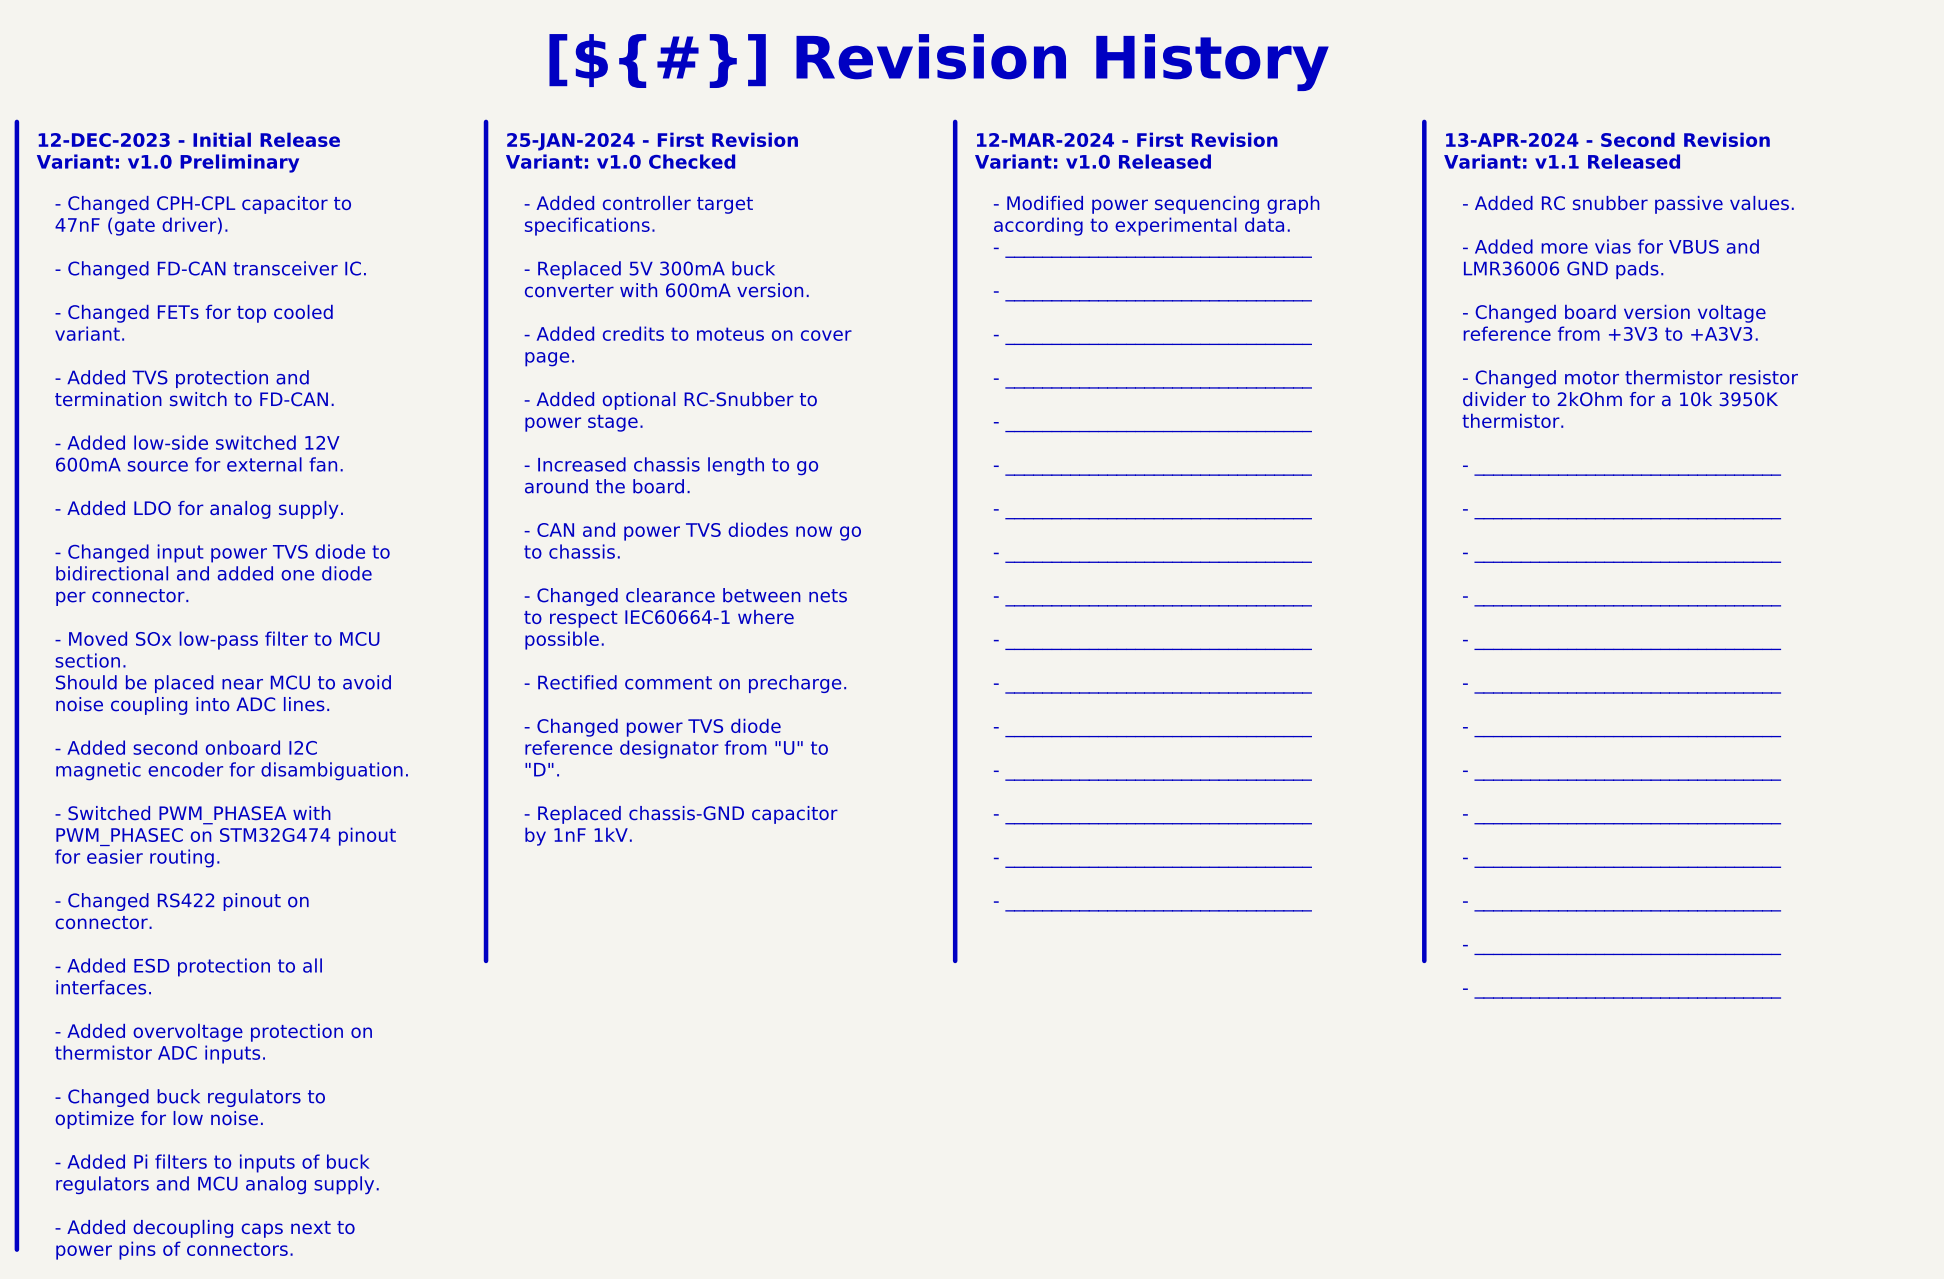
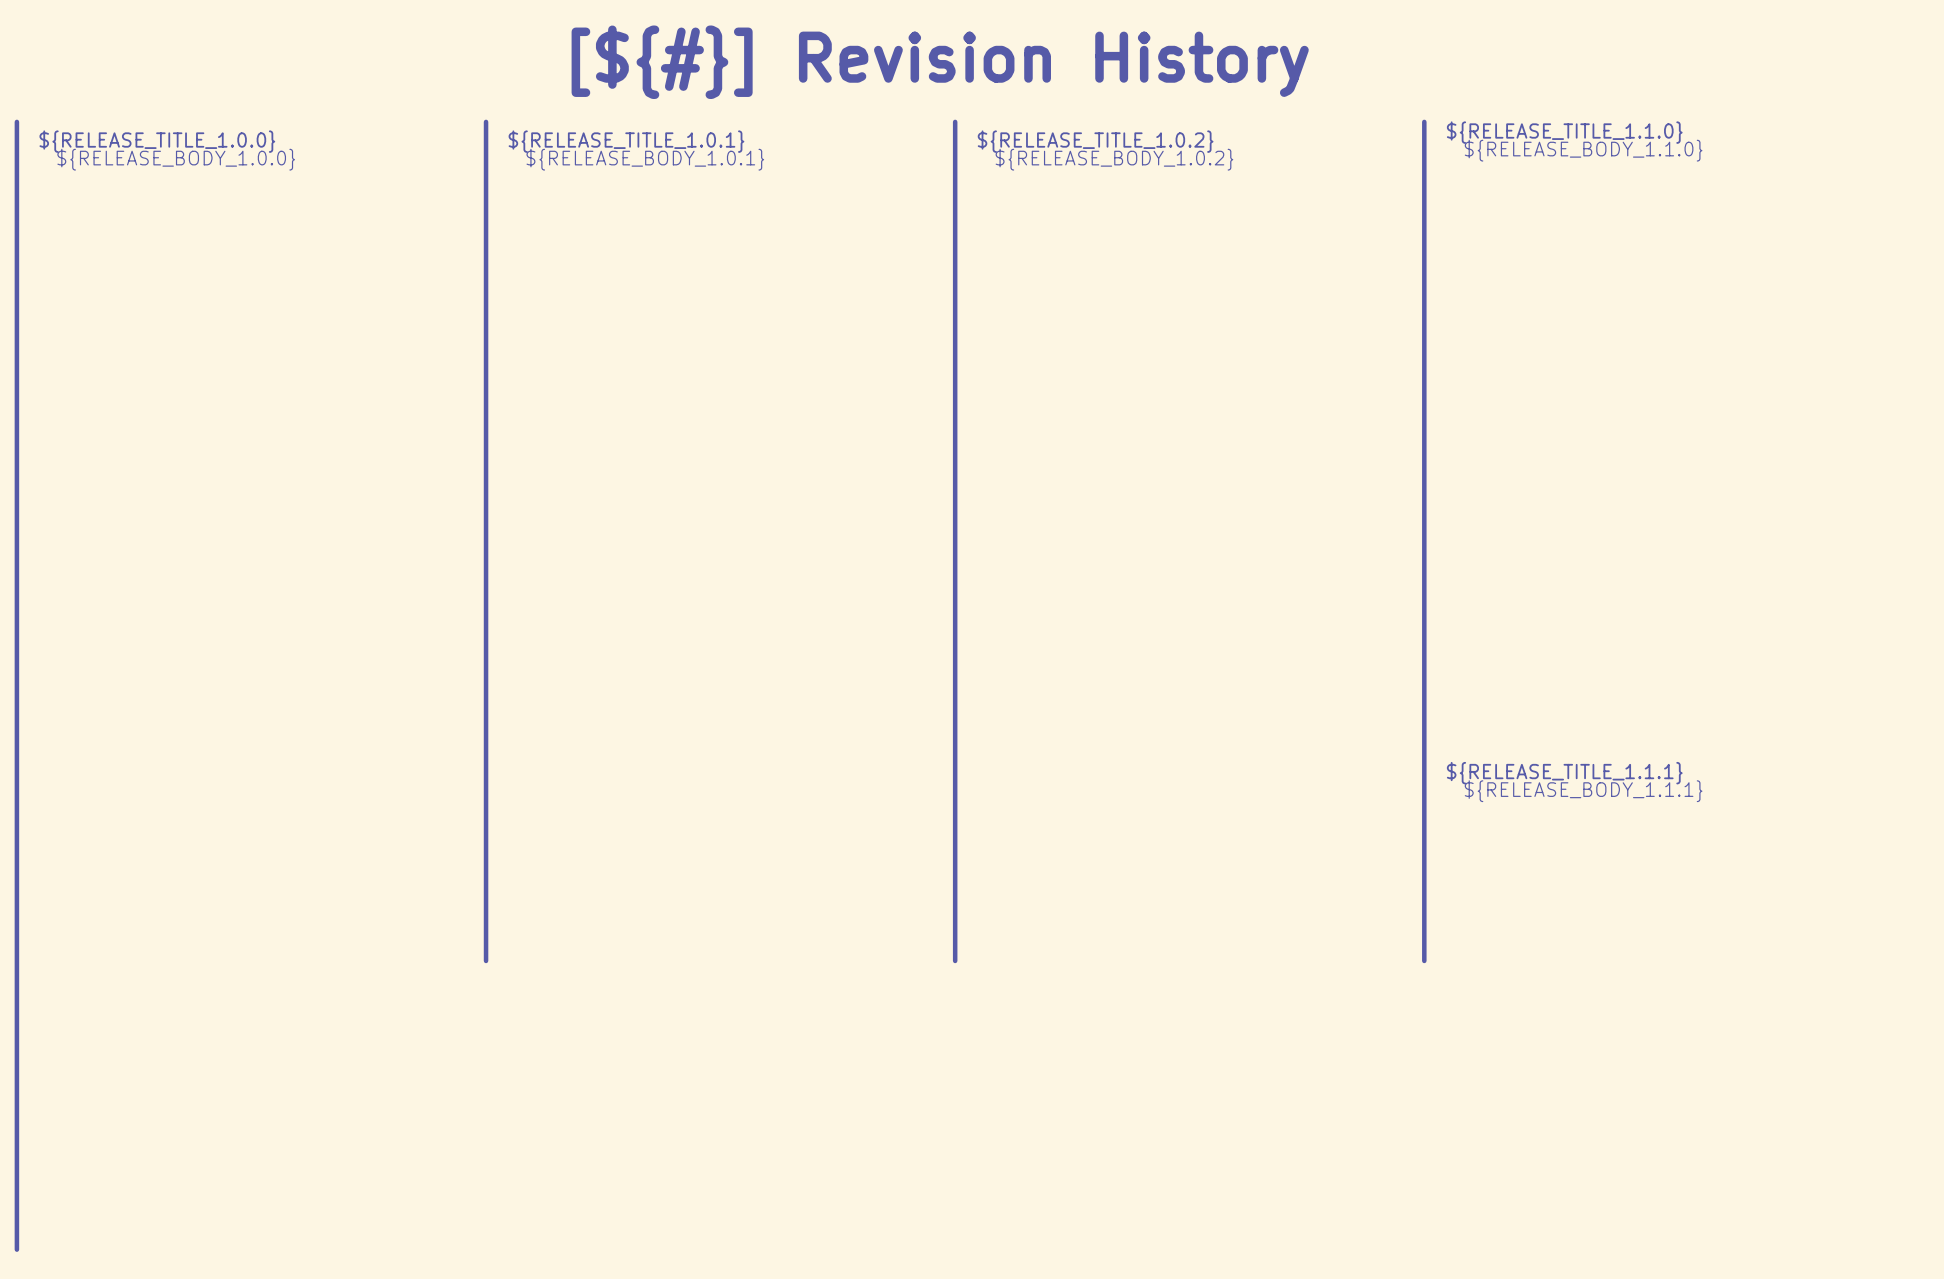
text: none -> ${RELEASE_TITLE_1.1.0} (1564, 132)
text: 12-DEC-2023 - Initial Release (189, 139) -> ${RELEASE_TITLE_1.0.0} (157, 141)
text: 12-MAR-2024 - First Revision (1127, 139) -> ${RELEASE_TITLE_1.0.2} (1095, 141)
text: 13-APR-2024 - Second Revision (1607, 139) -> none
text: 25-JAN-2024 - First Revision (652, 141) -> ${RELEASE_TITLE_1.0.1} (626, 141)
text: none -> ${RELEASE_BODY_1.1.0} (1583, 150)
text: none -> ${RELEASE_BODY_1.0.0} (176, 159)
text: none -> ${RELEASE_BODY_1.0.1} (645, 159)
text: none -> ${RELEASE_BODY_1.0.2} (1114, 159)
text: Variant: v1.0 Checked (620, 161) -> none
text: Variant: v1.0 Released (1092, 161) -> none
text: Variant: v1.1 Released (1562, 161) -> none
text: Variant: v1.0 Preliminary (168, 163) -> none
text: - Changed CPH-CPL capacitor to (203, 204) -> none
text: - Added controller target (638, 204) -> none
text: - Modified power sequencing graph (1156, 204) -> none
text: - Added RC snubber passive values. (1628, 204) -> none
text: 47nF (gate driver). (141, 226) -> none
text: specifications. (589, 226) -> none
text: according to experimental data. (1141, 226) -> none
text: - Added more vias for VBUS and (1610, 246) -> none
text: - _________________________________ (1152, 252) -> none
text: - Changed FD-CAN transceiver IC. (210, 270) -> none
text: - Replaced 5V 300mA buck (650, 270) -> none
text: LMR36006 GND pads. (1563, 270) -> none
text: converter with 600mA version. (666, 290) -> none
text: - _________________________________ (1152, 296) -> none
text: - Changed FETs for top cooled (194, 313) -> none
text: - Changed board version voltage (1614, 313) -> none
text: variant. (89, 333) -> none
text: - Added credits to moteus on cover (688, 333) -> none
text: reference from +3V3 to +A3V3. (1610, 333) -> none
text: - _________________________________ (1152, 339) -> none
text: page. (549, 359) -> none
text: - Added TVS protection and (182, 379) -> none
text: - Changed motor thermistor resistor (1630, 379) -> none
text: - _________________________________ (1152, 383) -> none
text: termination switch to FD-CAN. (194, 399) -> none
text: divider to 2kOhm for a 10k 3950K (1620, 399) -> none
text: - Added optional RC-Snubber to (670, 400) -> none
text: thermistor. (1512, 420) -> none
text: power stage. (583, 423) -> none
text: - _________________________________ (1152, 427) -> none
text: - Added low-side switched 12V (197, 442) -> none
text: 600mA source for external fan. (199, 464) -> none
text: - Increased chassis length to go (671, 466) -> none
text: - _________________________________ (1152, 470) -> none
text: - _________________________________ (1622, 470) -> none
text: around the board. (607, 486) -> none
text: - Added LDO for analog supply. (199, 509) -> none
text: - _________________________________ (1152, 514) -> none
text: - _________________________________ (1622, 514) -> none
text: - CAN and power TVS diodes now go (692, 531) -> none
text: to chassis. (572, 551) -> none
text: - Changed input power TVS diode to (222, 553) -> none
text: - _________________________________ (1152, 557) -> none
text: - _________________________________ (1622, 557) -> none
text: bidirectional and added one diode (213, 573) -> none
text: - Changed clearance between nets (685, 596) -> none
text: per connector. (122, 597) -> none
text: - _________________________________ (1152, 601) -> none
text: - _________________________________ (1622, 601) -> none
text: to respect IEC60664-1 where (658, 618) -> none
text: - Moved SOx low-pass filter to MCU (217, 640) -> none
text: possible. (564, 640) -> none
text: - _________________________________ (1152, 644) -> none
text: - _________________________________ (1622, 644) -> none
text: section. (90, 660) -> none
text: Should be placed near MCU to avoid (223, 684) -> none
text: - Rectified comment on precharge. (685, 684) -> none
text: - _________________________________ (1152, 688) -> none
text: - _________________________________ (1622, 688) -> none
text: noise coupling into ADC lines. (192, 705) -> none
text: - Changed power TVS diode (652, 727) -> none
text: - _________________________________ (1152, 732) -> none
text: - _________________________________ (1622, 732) -> none
text: - Added second onboard I2C (186, 747) -> none
text: reference designator from "U" to (676, 749) -> none
text: "D". (542, 769) -> none
text: magnetic encoder for disambiguation. (232, 771) -> none
text: none -> ${RELEASE_TITLE_1.1.1} (1564, 773)
text: - _________________________________ (1152, 775) -> none
text: - _________________________________ (1622, 775) -> none
text: none -> ${RELEASE_BODY_1.1.1} (1583, 791)
text: - Replaced chassis-GND capacitor (681, 814) -> none
text: - Switched PWM_PHASEA with (192, 815) -> none
text: - _________________________________ (1152, 819) -> none
text: - _________________________________ (1622, 819) -> none
text: PWM_PHASEC on STM32G474 pinout (226, 836) -> none
text: by 1nF 1kV. (578, 836) -> none
text: for easier routing. (137, 858) -> none
text: - _________________________________ (1152, 862) -> none
text: - _________________________________ (1622, 862) -> none
text: - Changed RS422 pinout on (182, 902) -> none
text: - _________________________________ (1152, 906) -> none
text: - _________________________________ (1622, 906) -> none
text: connector. (103, 922) -> none
text: - _________________________________ (1622, 949) -> none
text: - Added ESD protection to all (188, 967) -> none
text: interfaces. (103, 987) -> none
text: - _________________________________ (1622, 993) -> none
text: - Added overvoltage protection on (213, 1032) -> none
text: thermistor ADC inputs. (160, 1054) -> none
text: - Changed buck regulators to (190, 1098) -> none
text: optimize for low noise. (159, 1119) -> none
text: - Added Pi filters to inputs of buck (212, 1163) -> none
text: regulators and MCU analog supply. (217, 1185) -> none
text: - Added decoupling caps next to (205, 1228) -> none
text: power pins of connectors. (174, 1250) -> none

